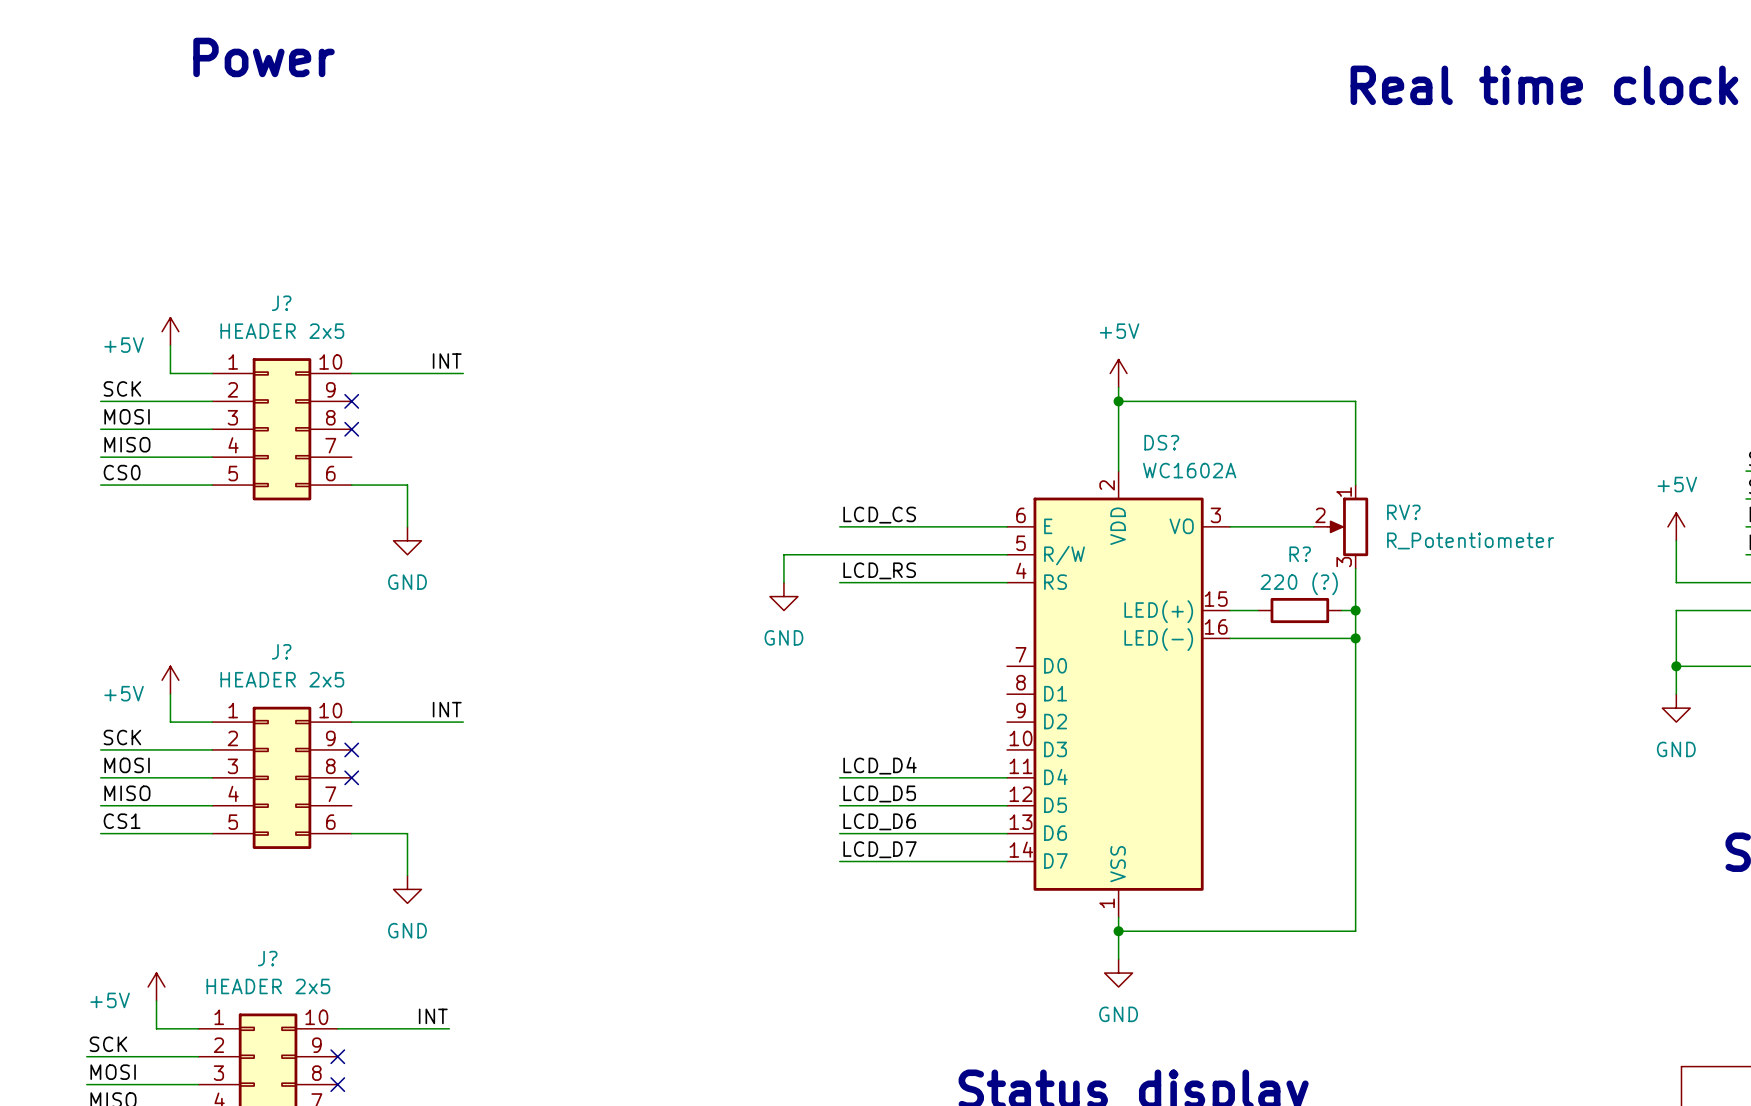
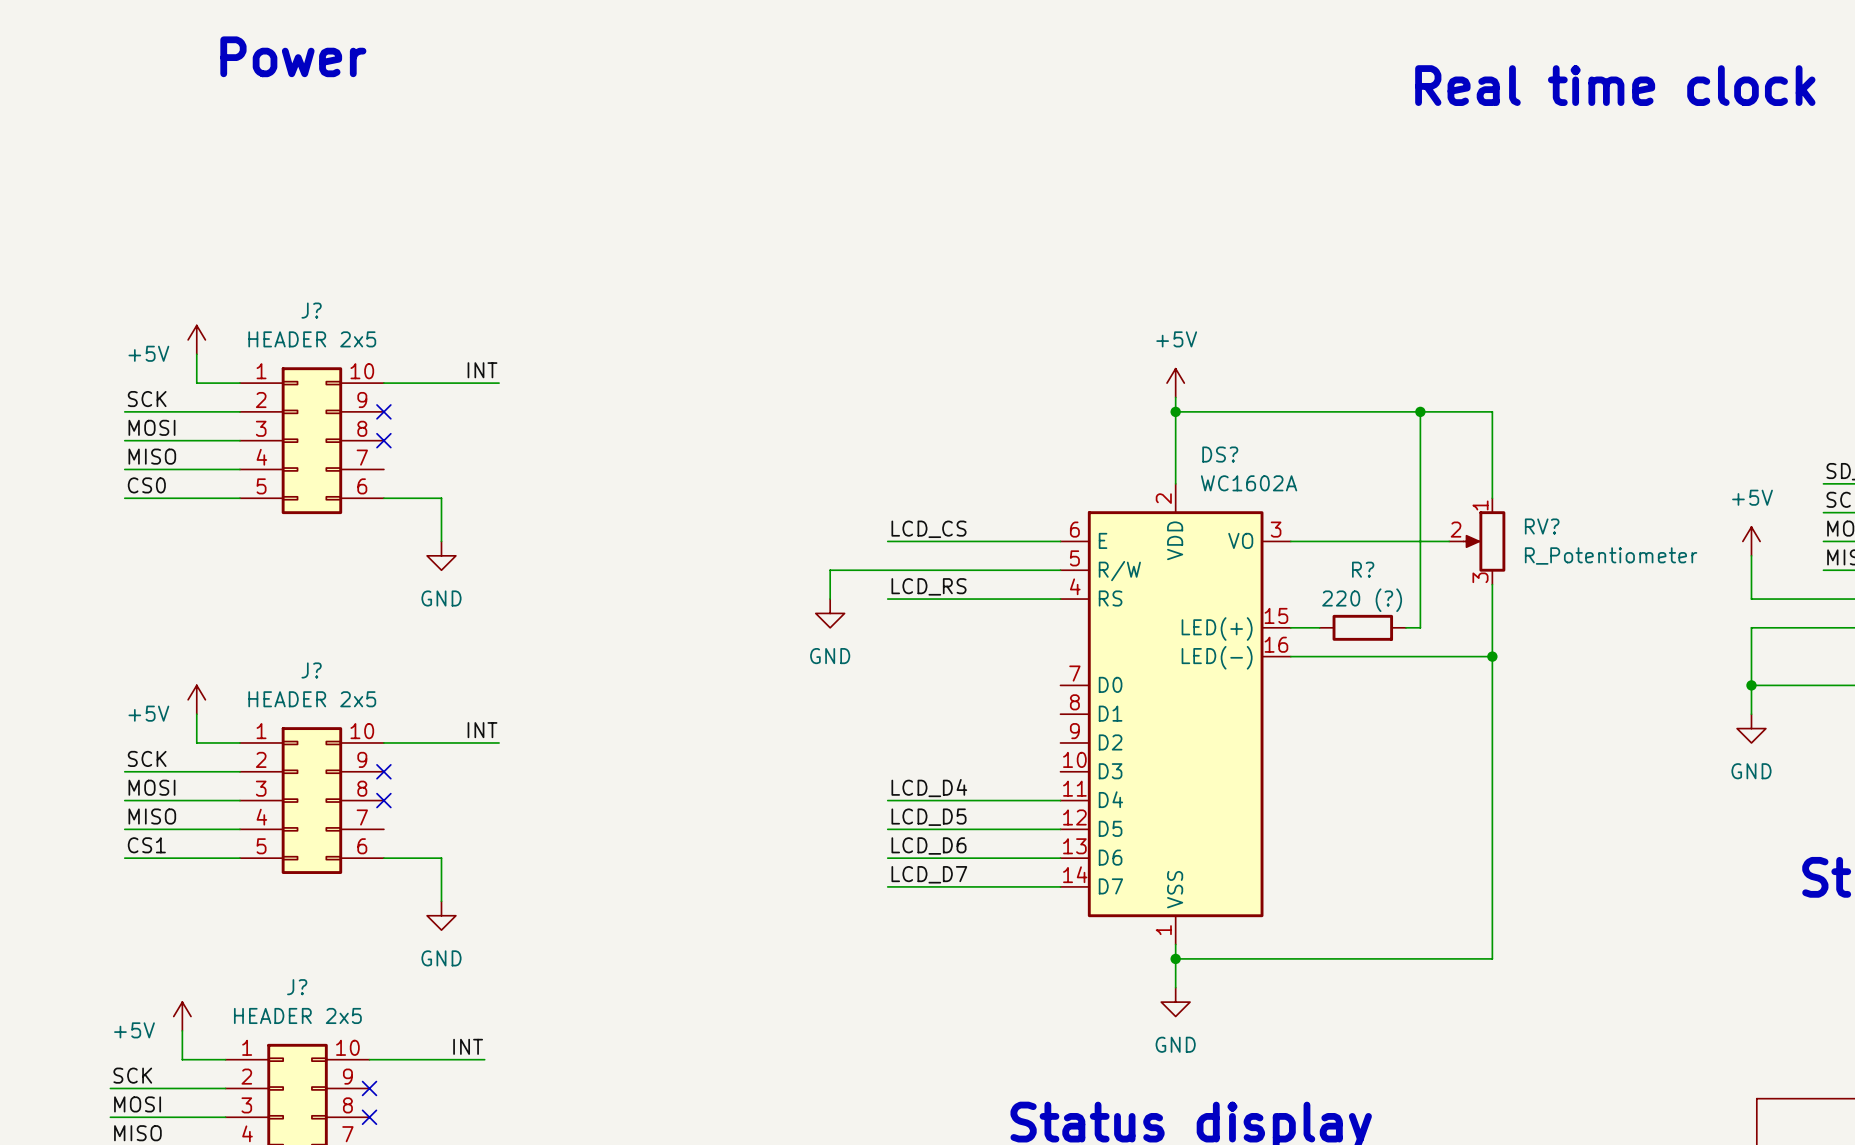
wire: none -> (1420, 411) (1492, 411) (1492, 498)
junction: none -> (1420, 411)
wire: none -> (1420, 498) (1420, 584)
wire: none -> (1377, 541) (1449, 541)
RV? position: (1340, 526) -> (1477, 541)
wire: (1355, 610) (1355, 931) -> (1492, 584) (1492, 958) (1420, 958)
junction: (1355, 610) -> none
wire: none -> (1420, 656) (1492, 656)
junction: (1355, 638) -> none
junction: none -> (1492, 656)

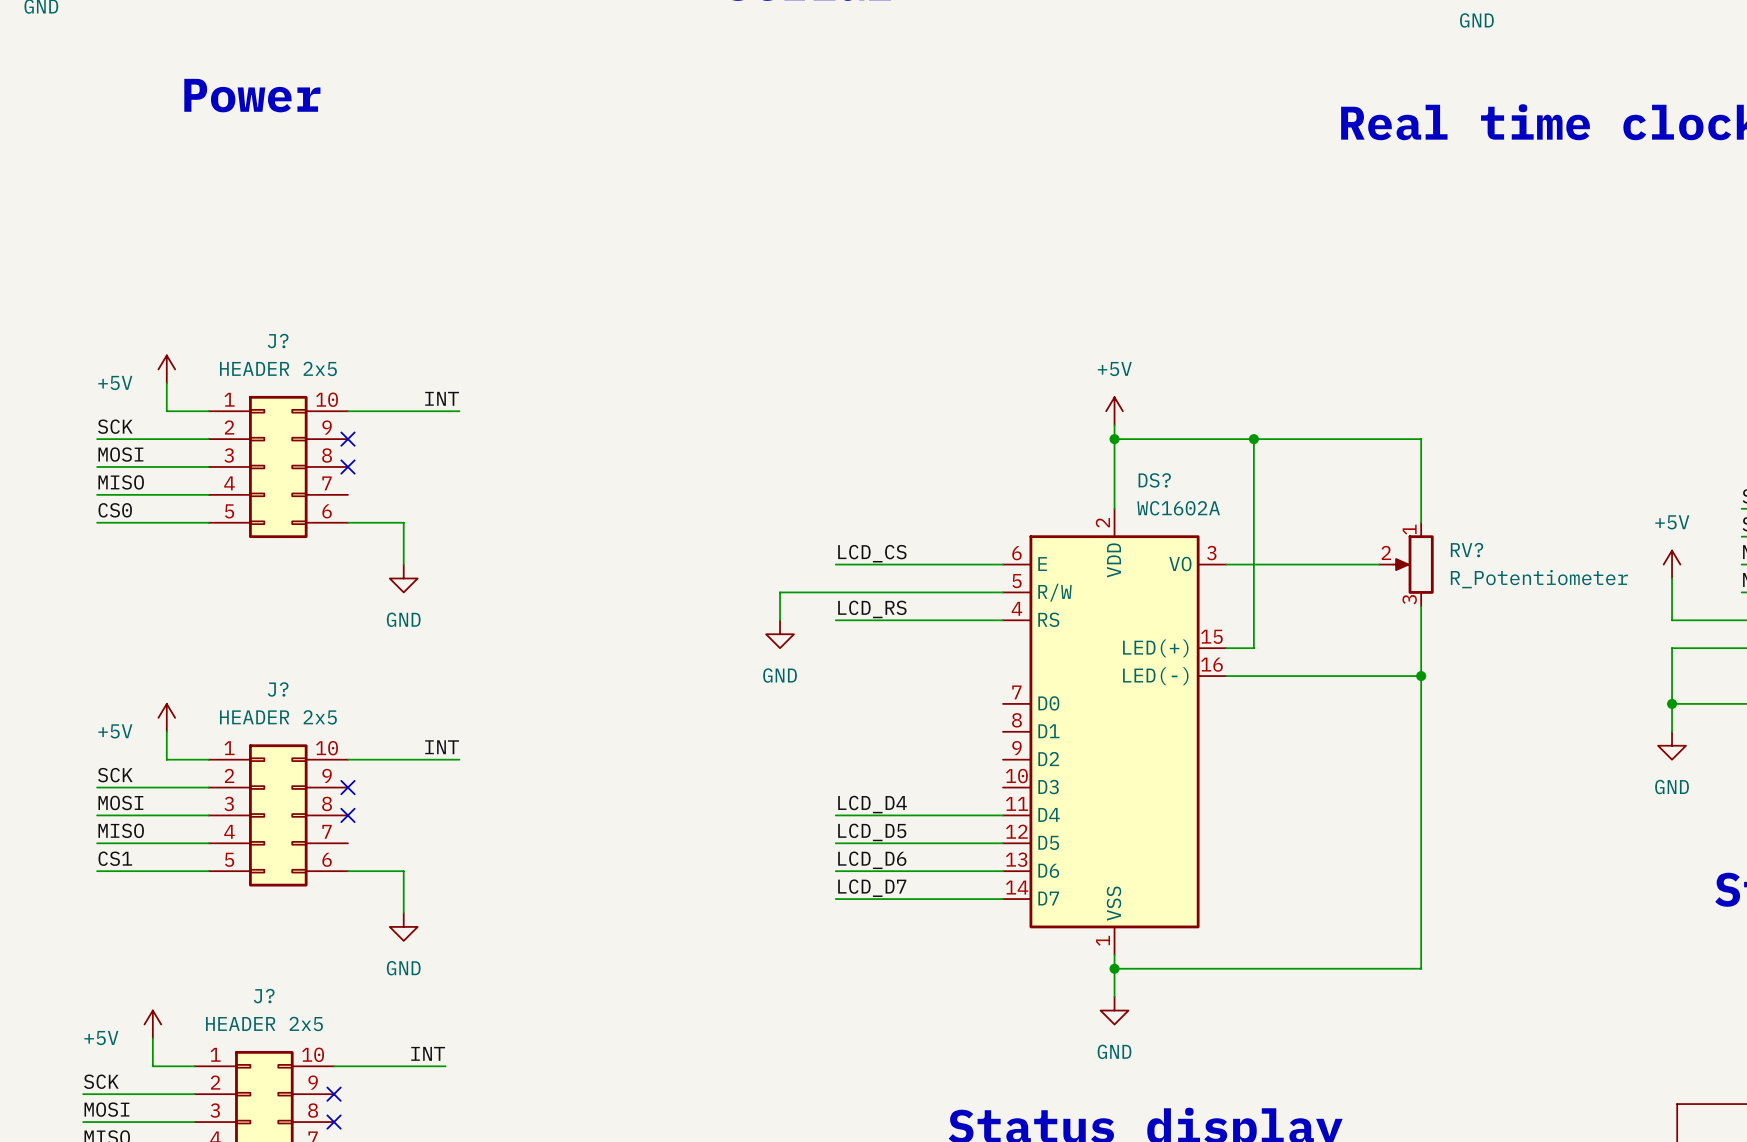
wire: none -> (1253, 439) (1253, 648)
junction: none -> (1253, 439)
wire: (1420, 411) (1420, 627) (1405, 627) -> none
junction: (1420, 411) -> none
R?: 220 (?) (1362, 627) -> none

